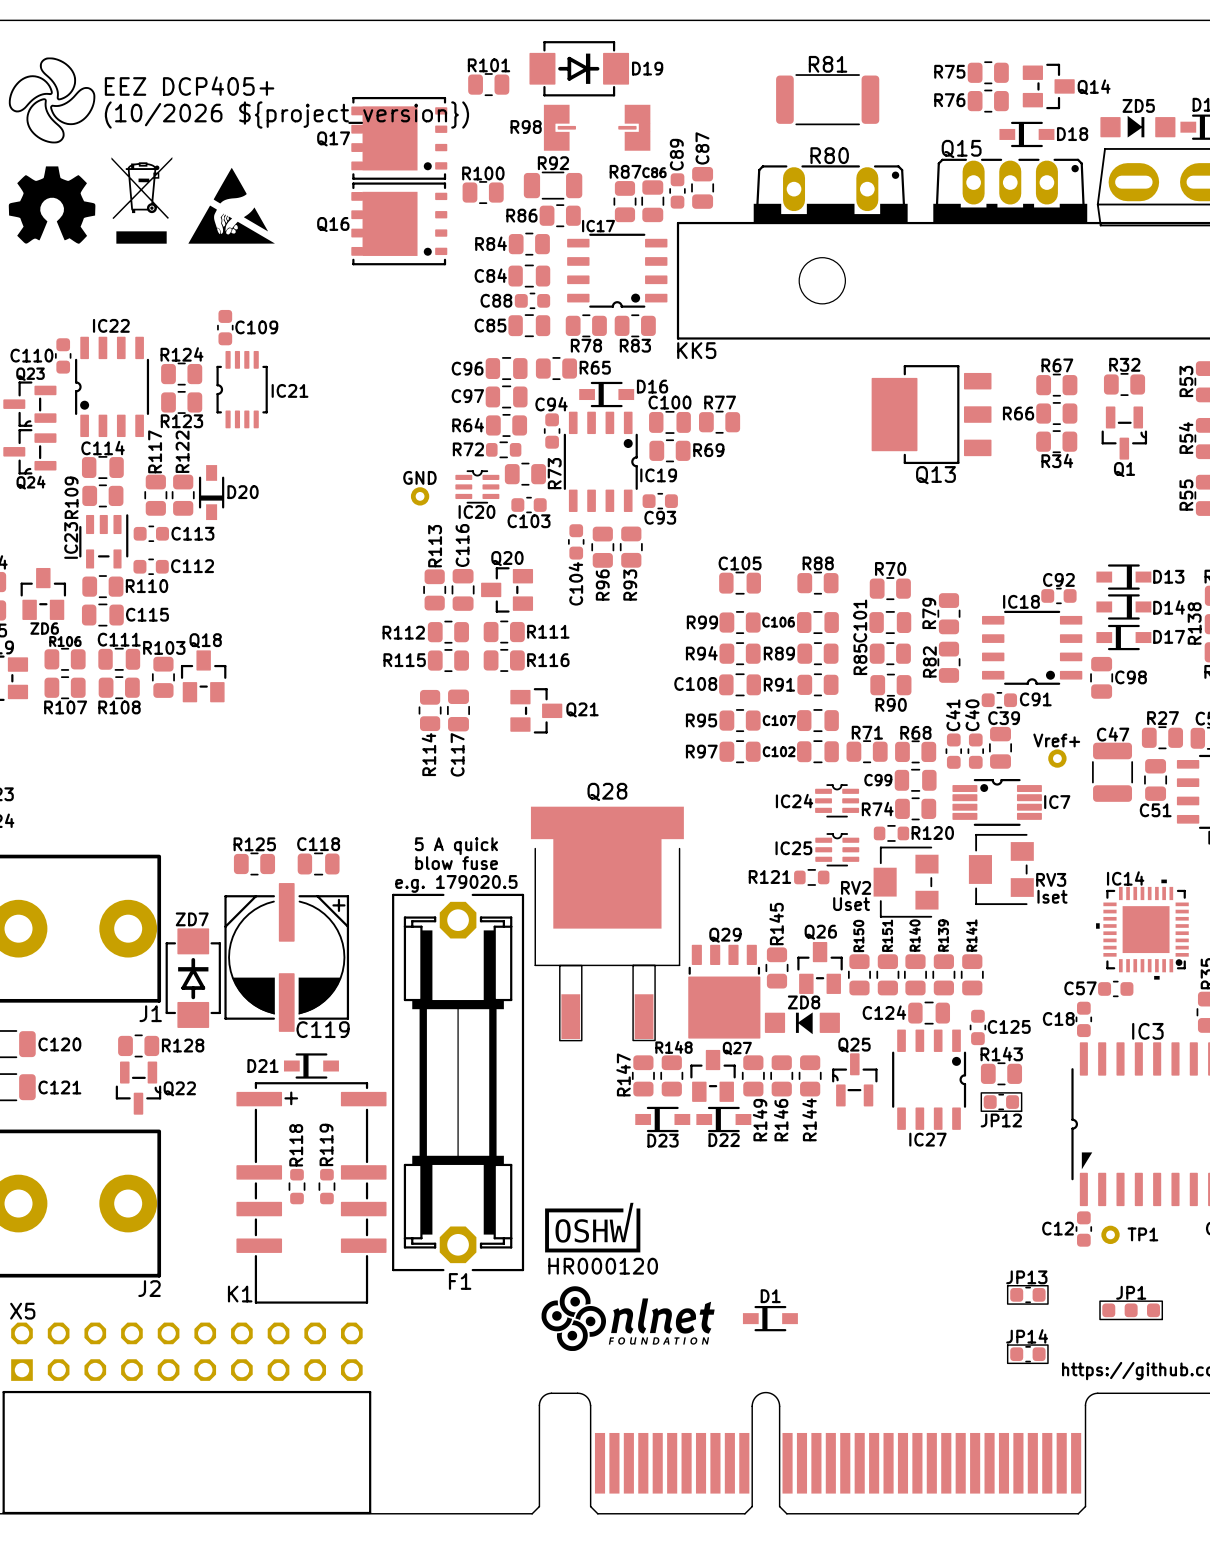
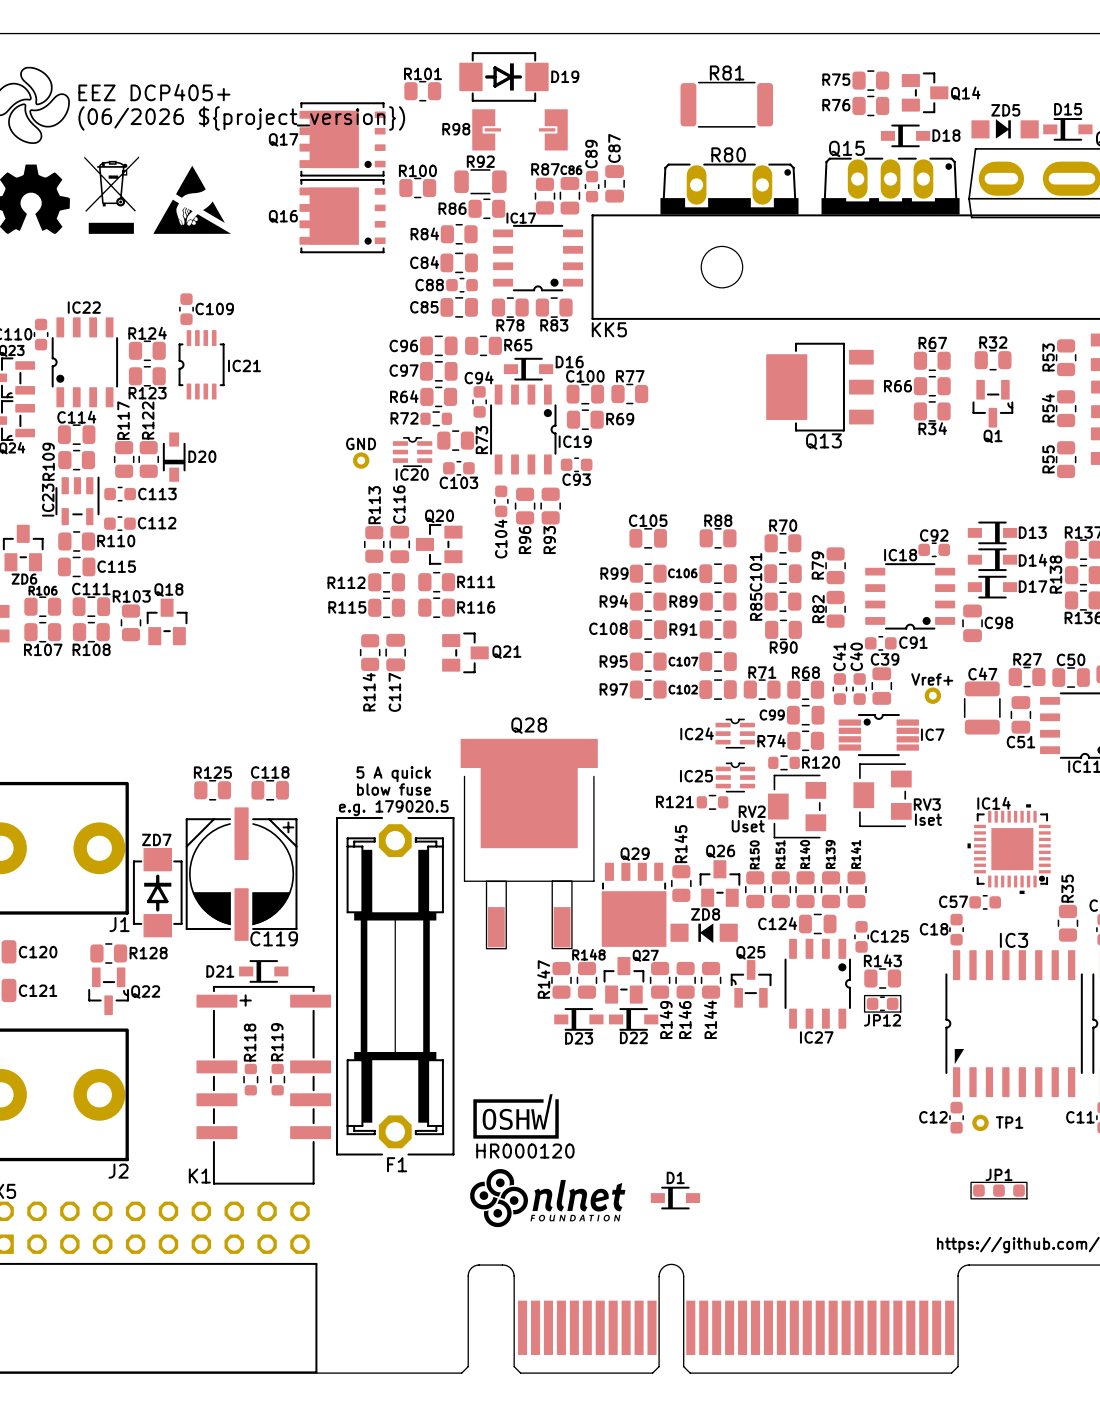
text: (10/2026 ${project_version}) (286, 115) -> (06/2026 ${project_version}) (241, 118)
JP13: (1027, 1294) -> none
JP14: (1027, 1354) -> none

